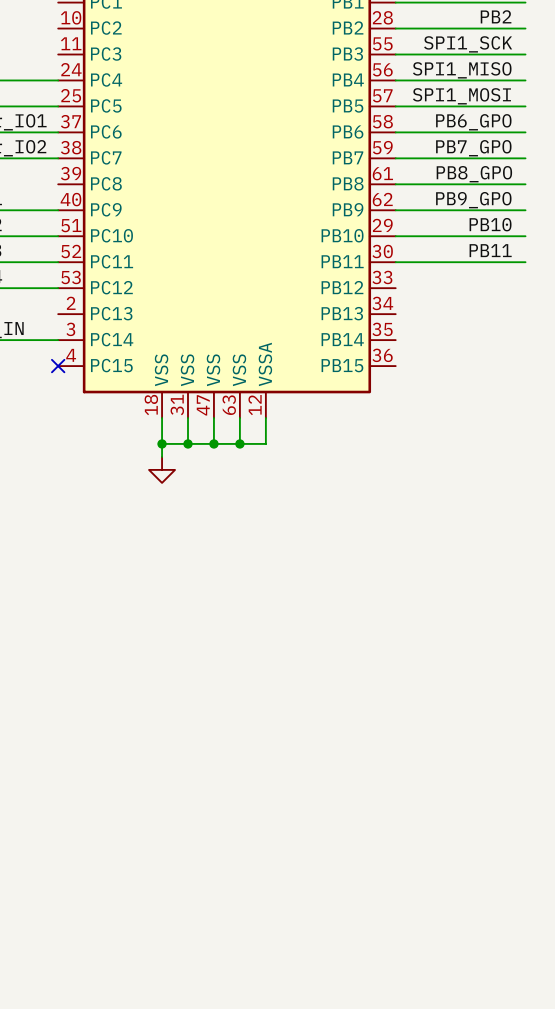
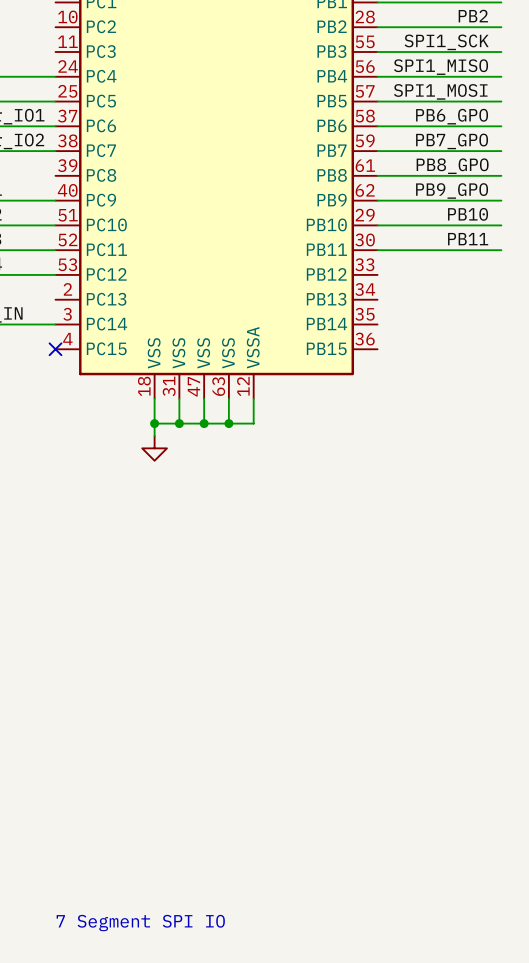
text: none -> 7 Segment SPI IO (140, 923)

